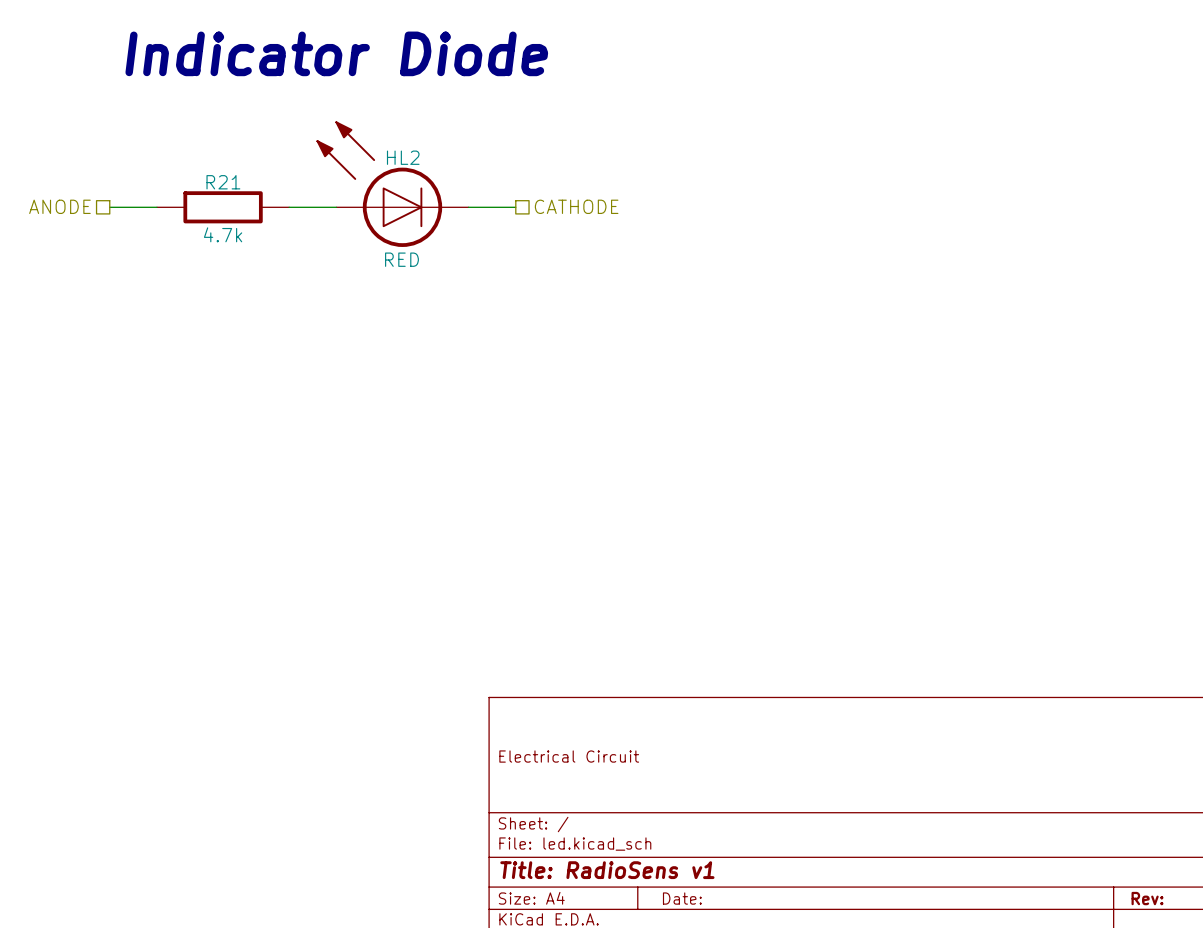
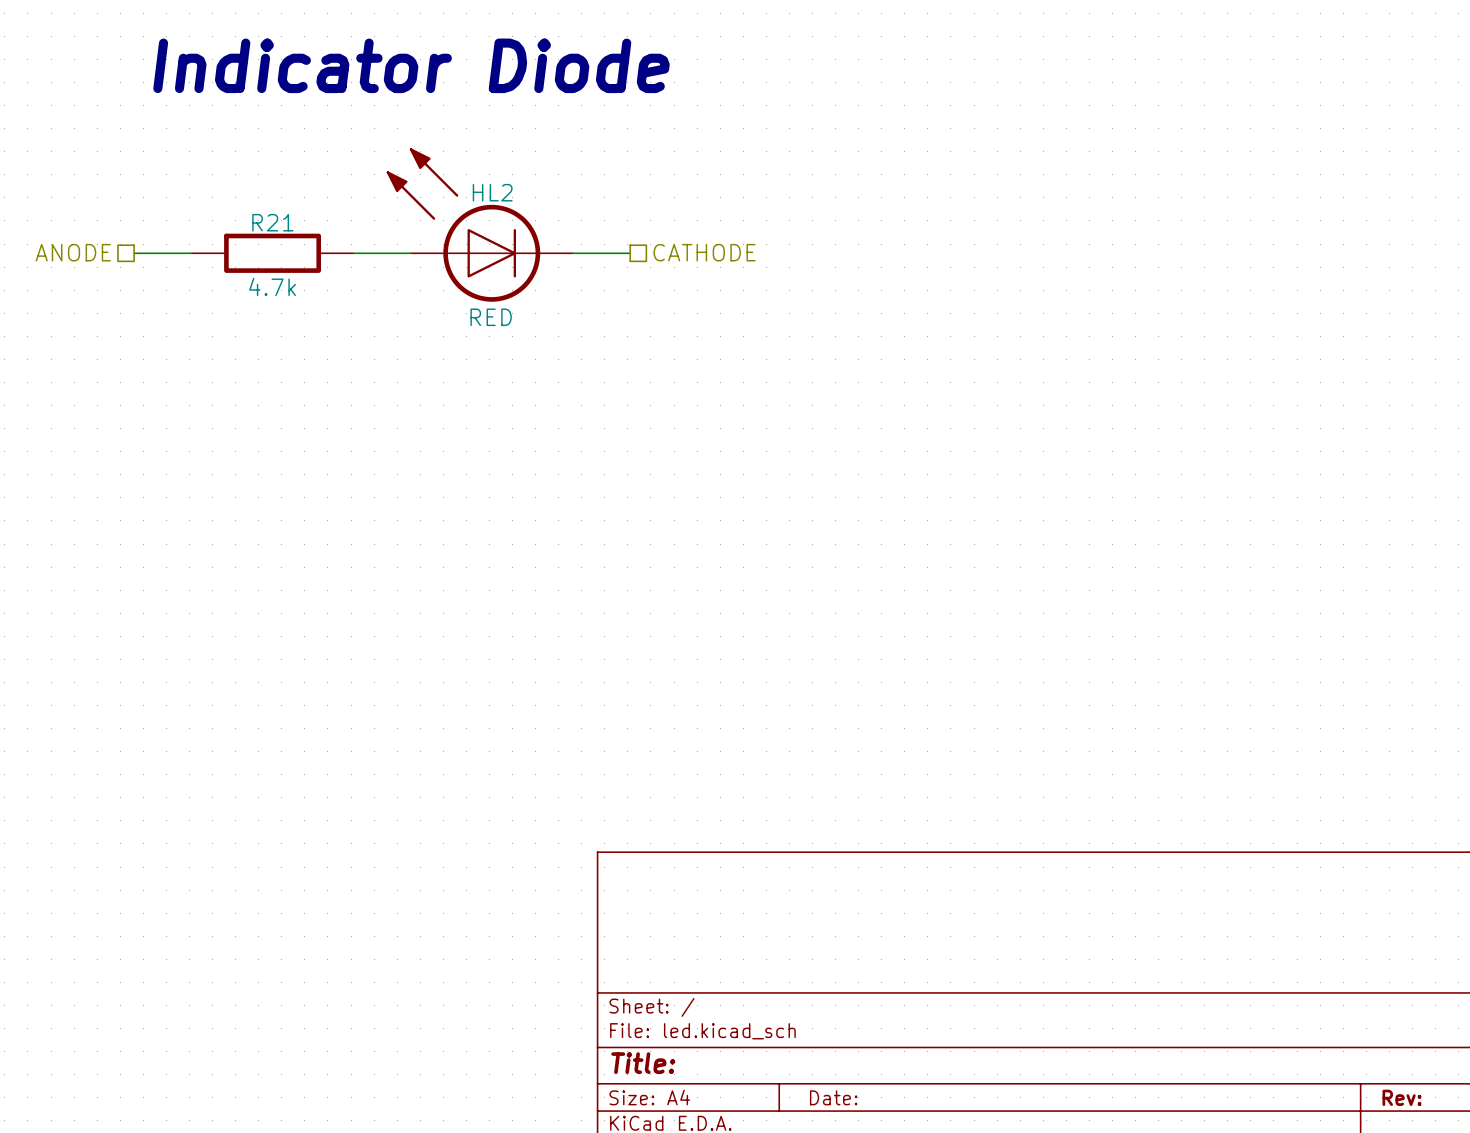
title block: Electrical Circuit (569, 756) -> none
title block: Title: RadioSens v1 (607, 870) -> Title: (643, 1063)

